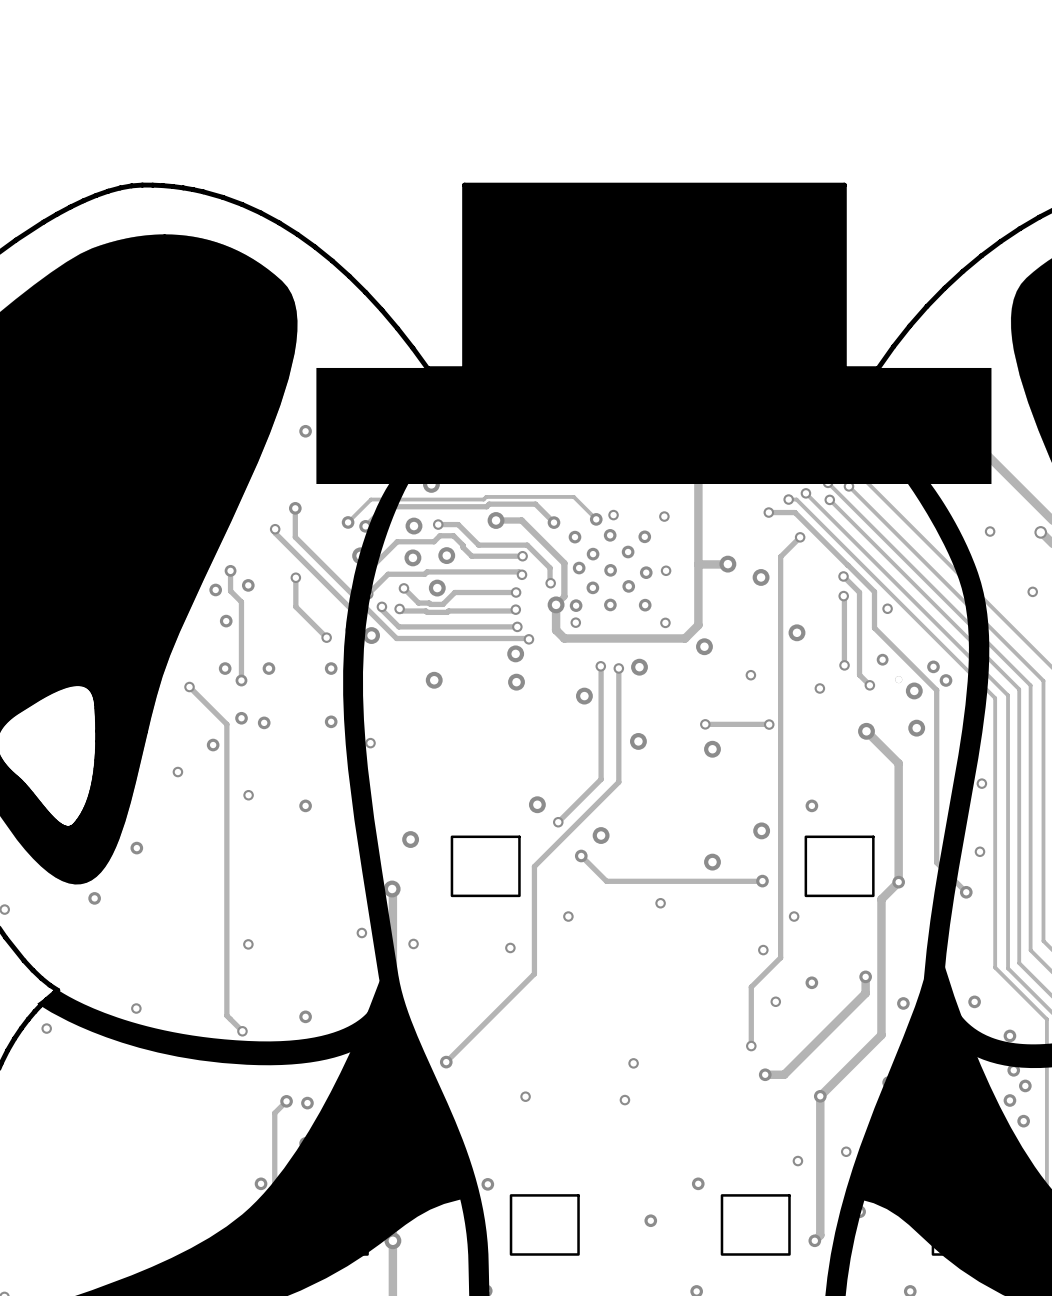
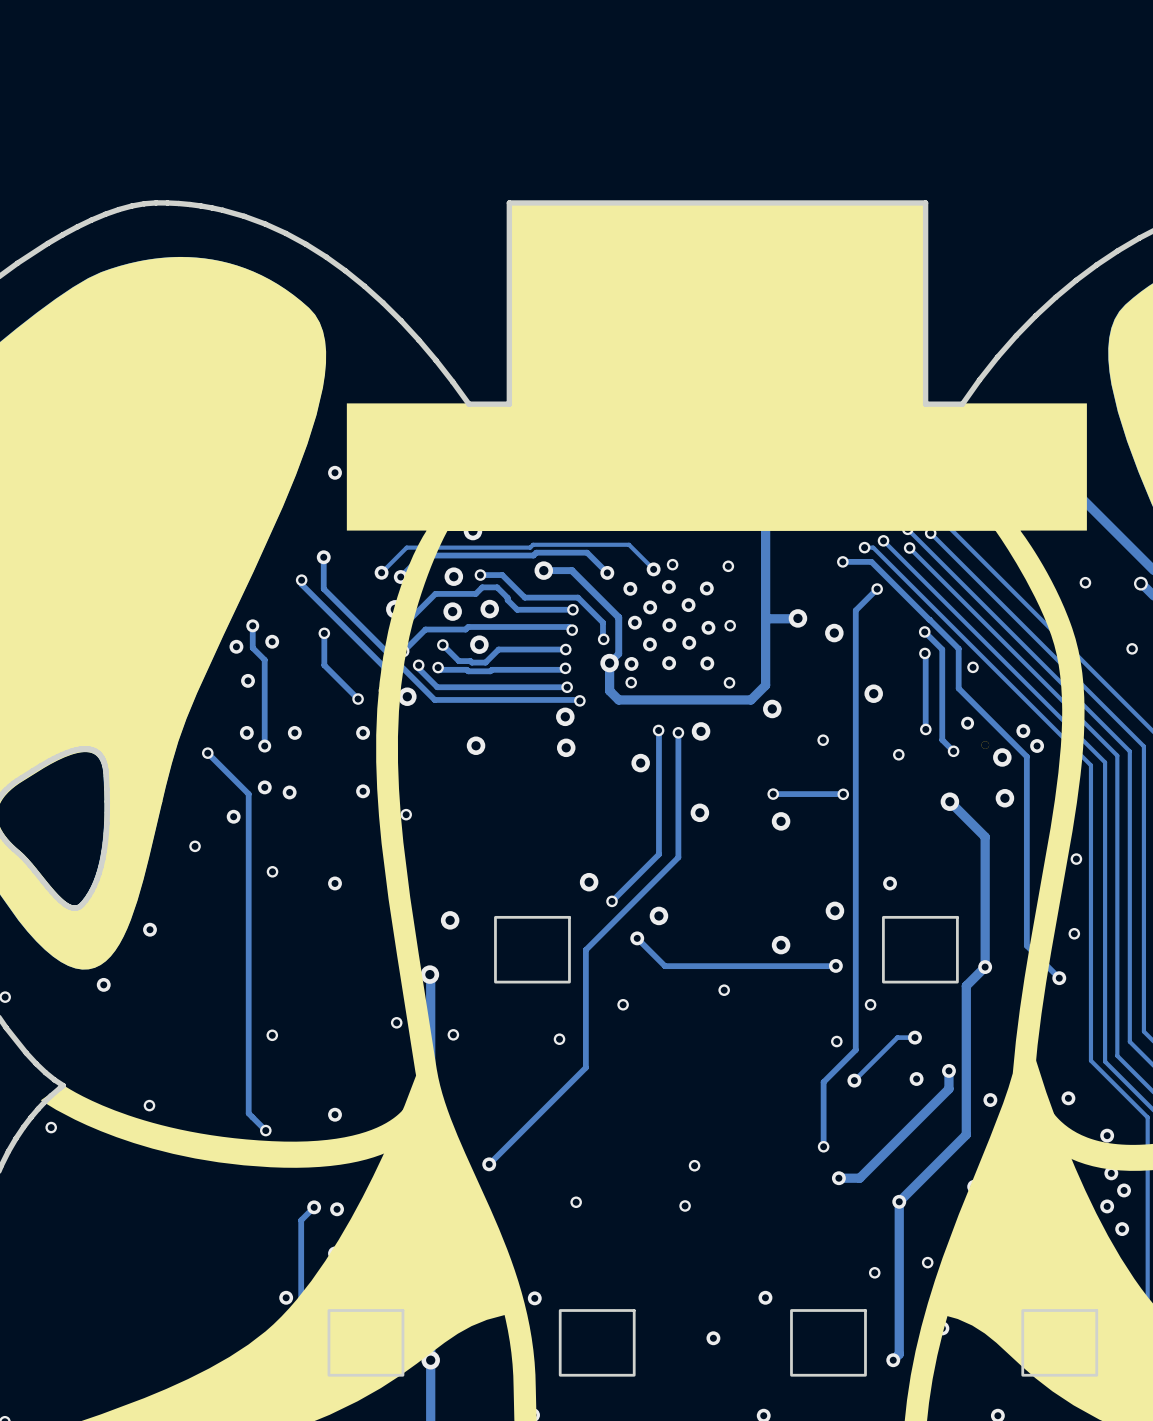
track: none -> (914, 1037) (897, 1037) (854, 1080)
via: none -> (914, 1037)
via: (811, 982) -> none
via: none -> (916, 1079)
via: none -> (854, 1080)
via: (775, 1001) -> none

